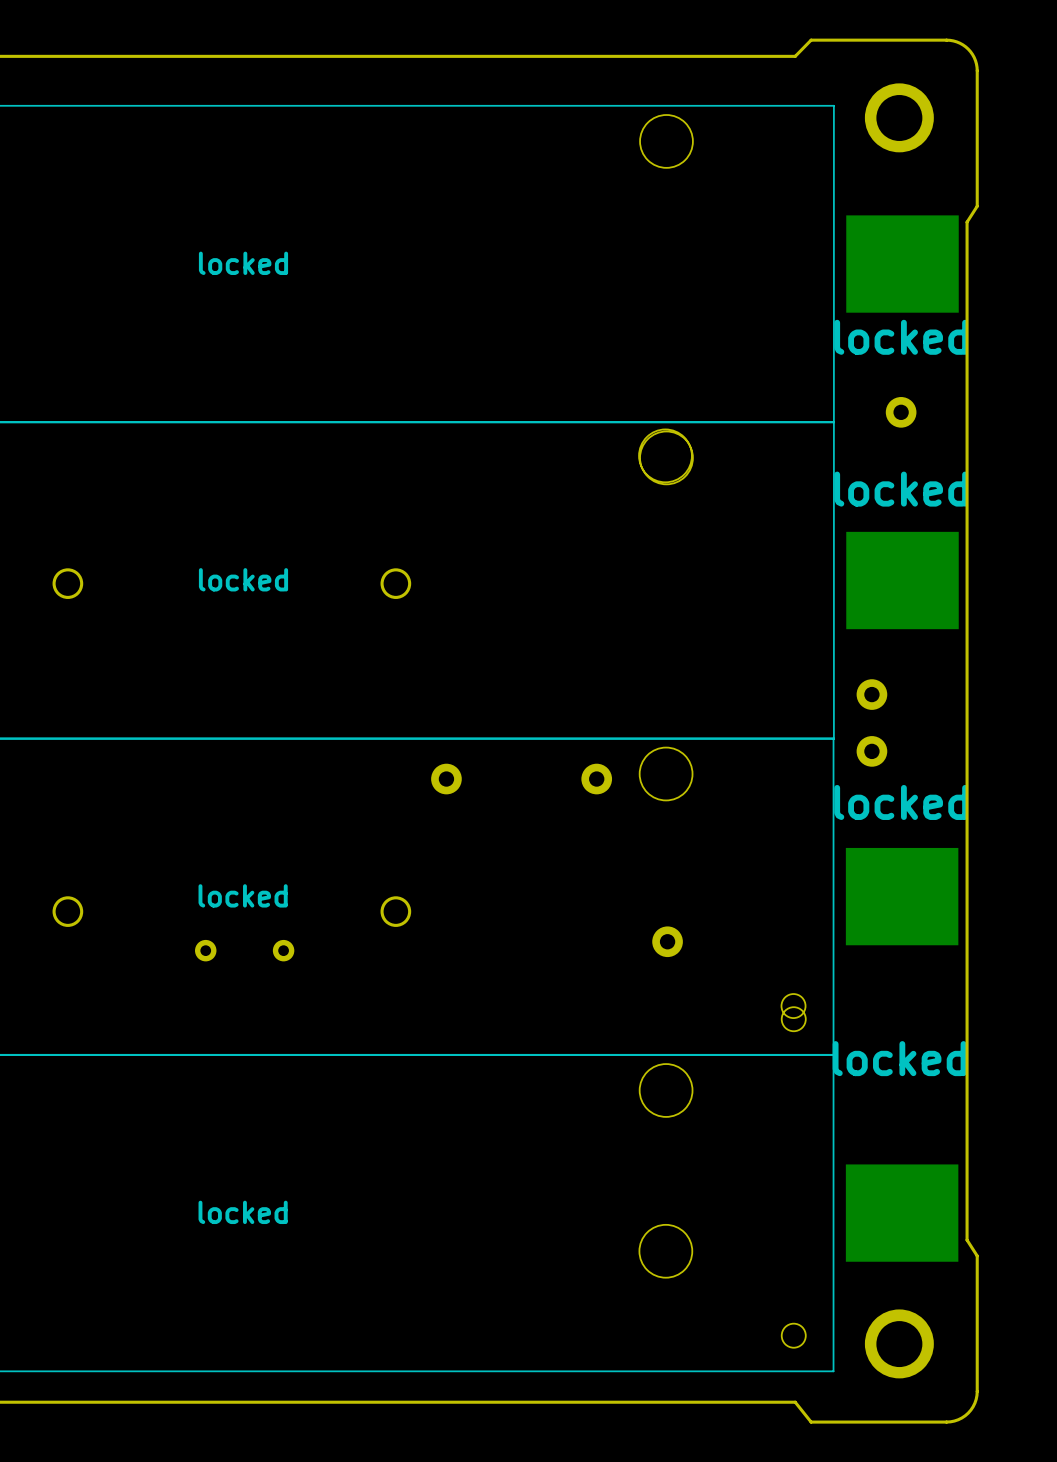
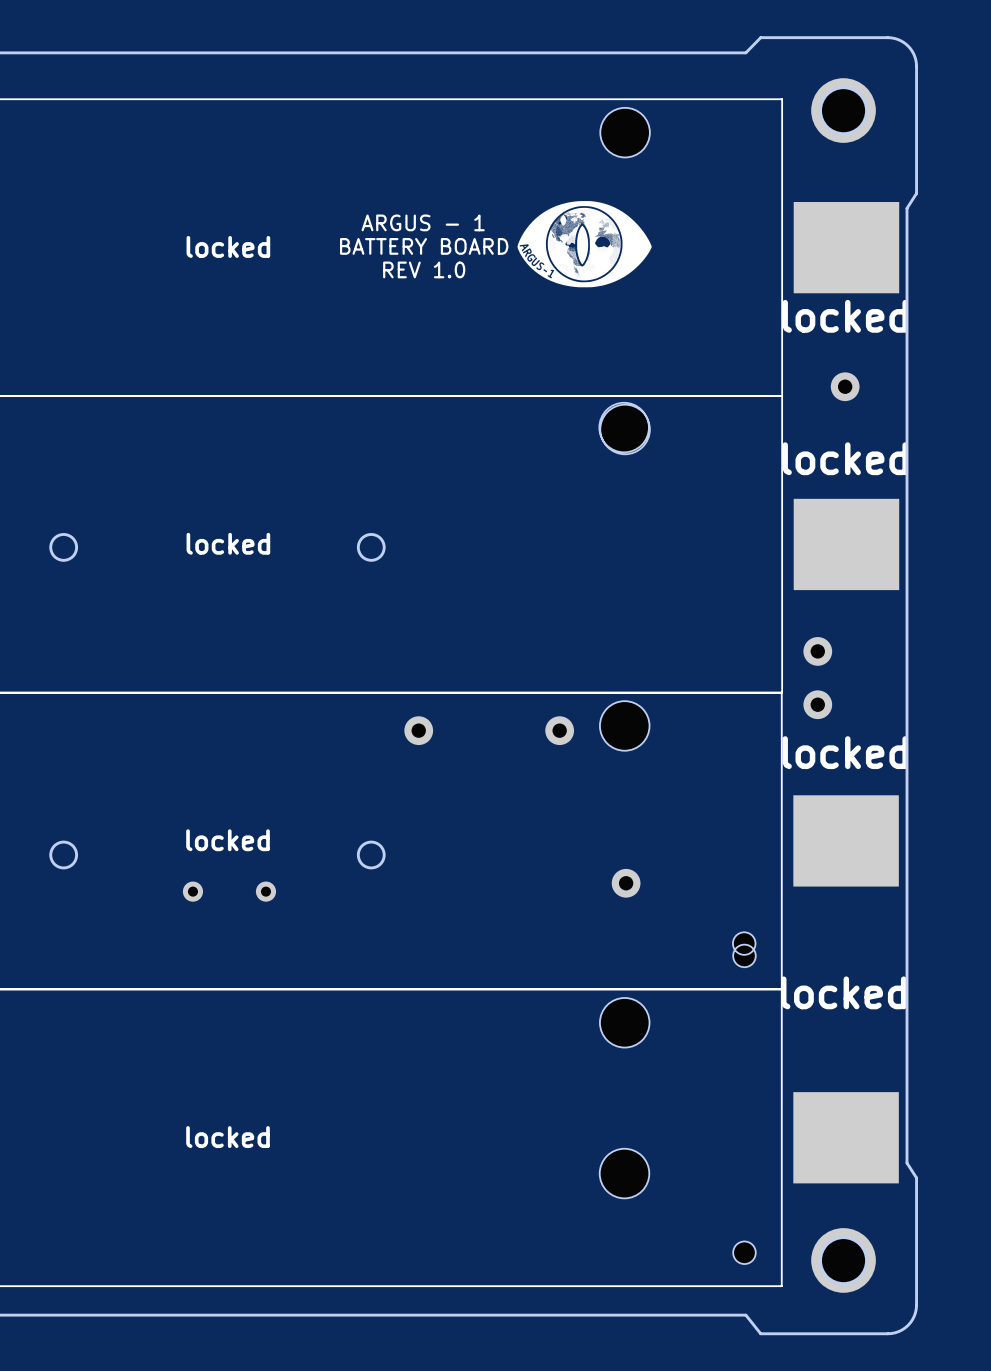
drawing: none -> [517, 201, 652, 288]
text: none -> ARGUS - 1 (423, 222)
text: none -> BATTERY BOARD (424, 246)
text: none -> REV 1.0 (424, 269)

